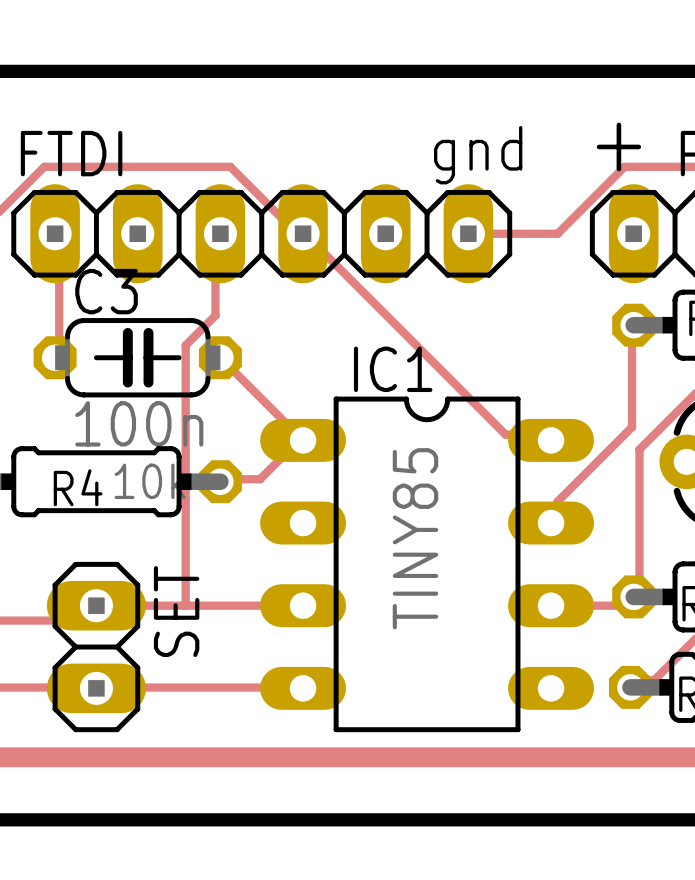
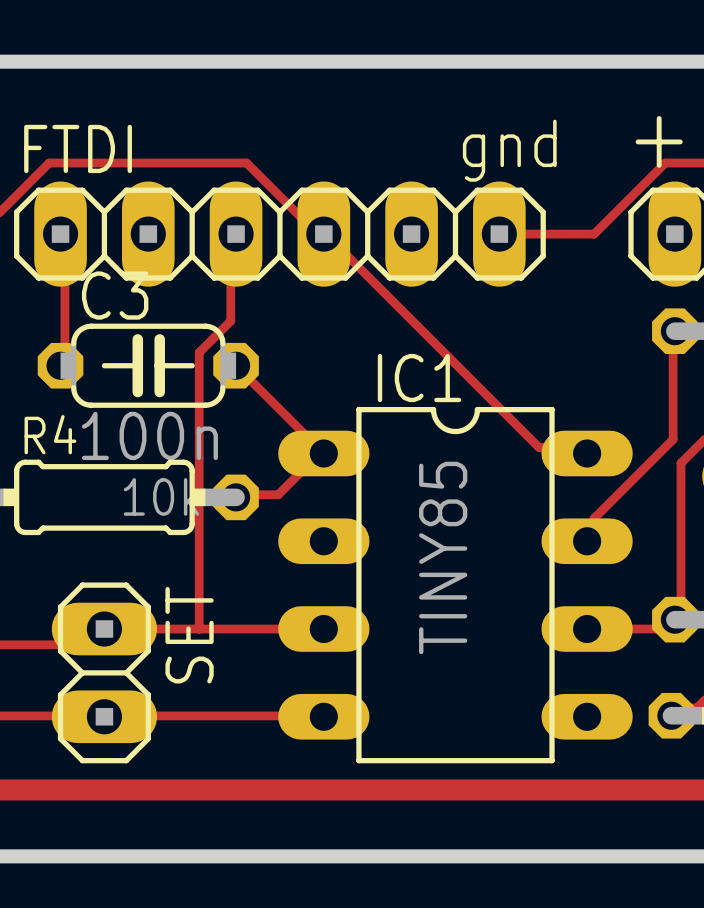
R4 name position: R4 (78, 487) -> R4 (50, 434)

